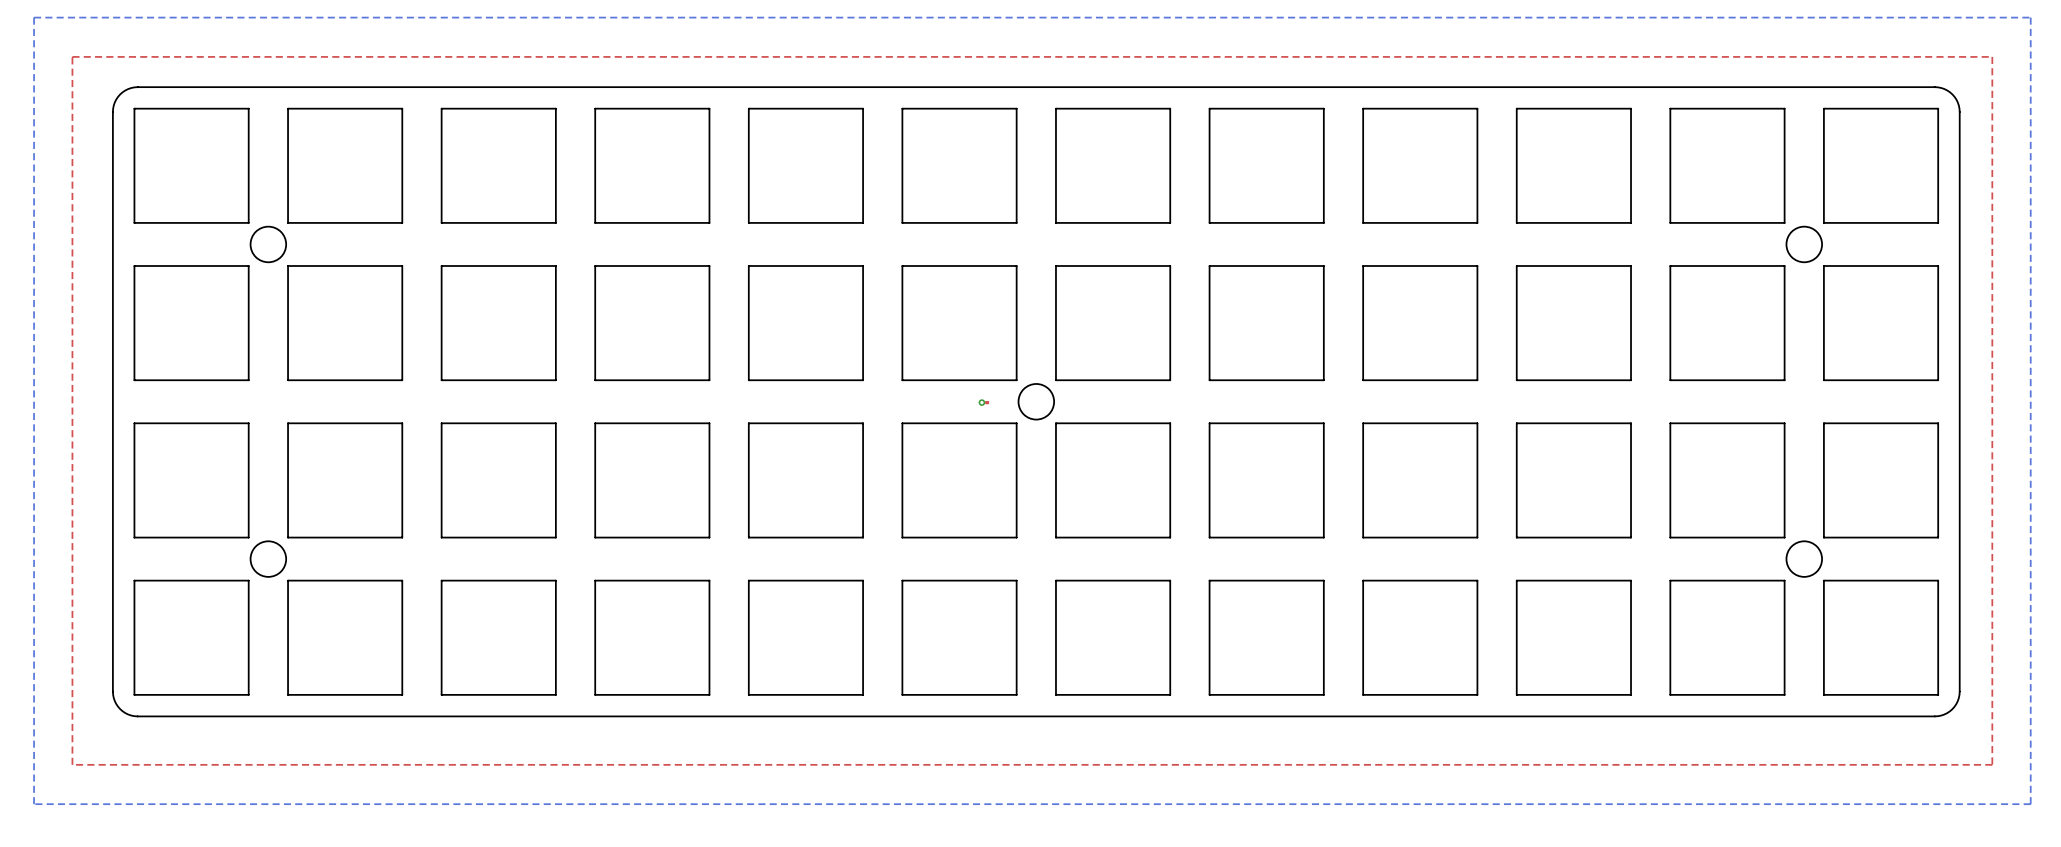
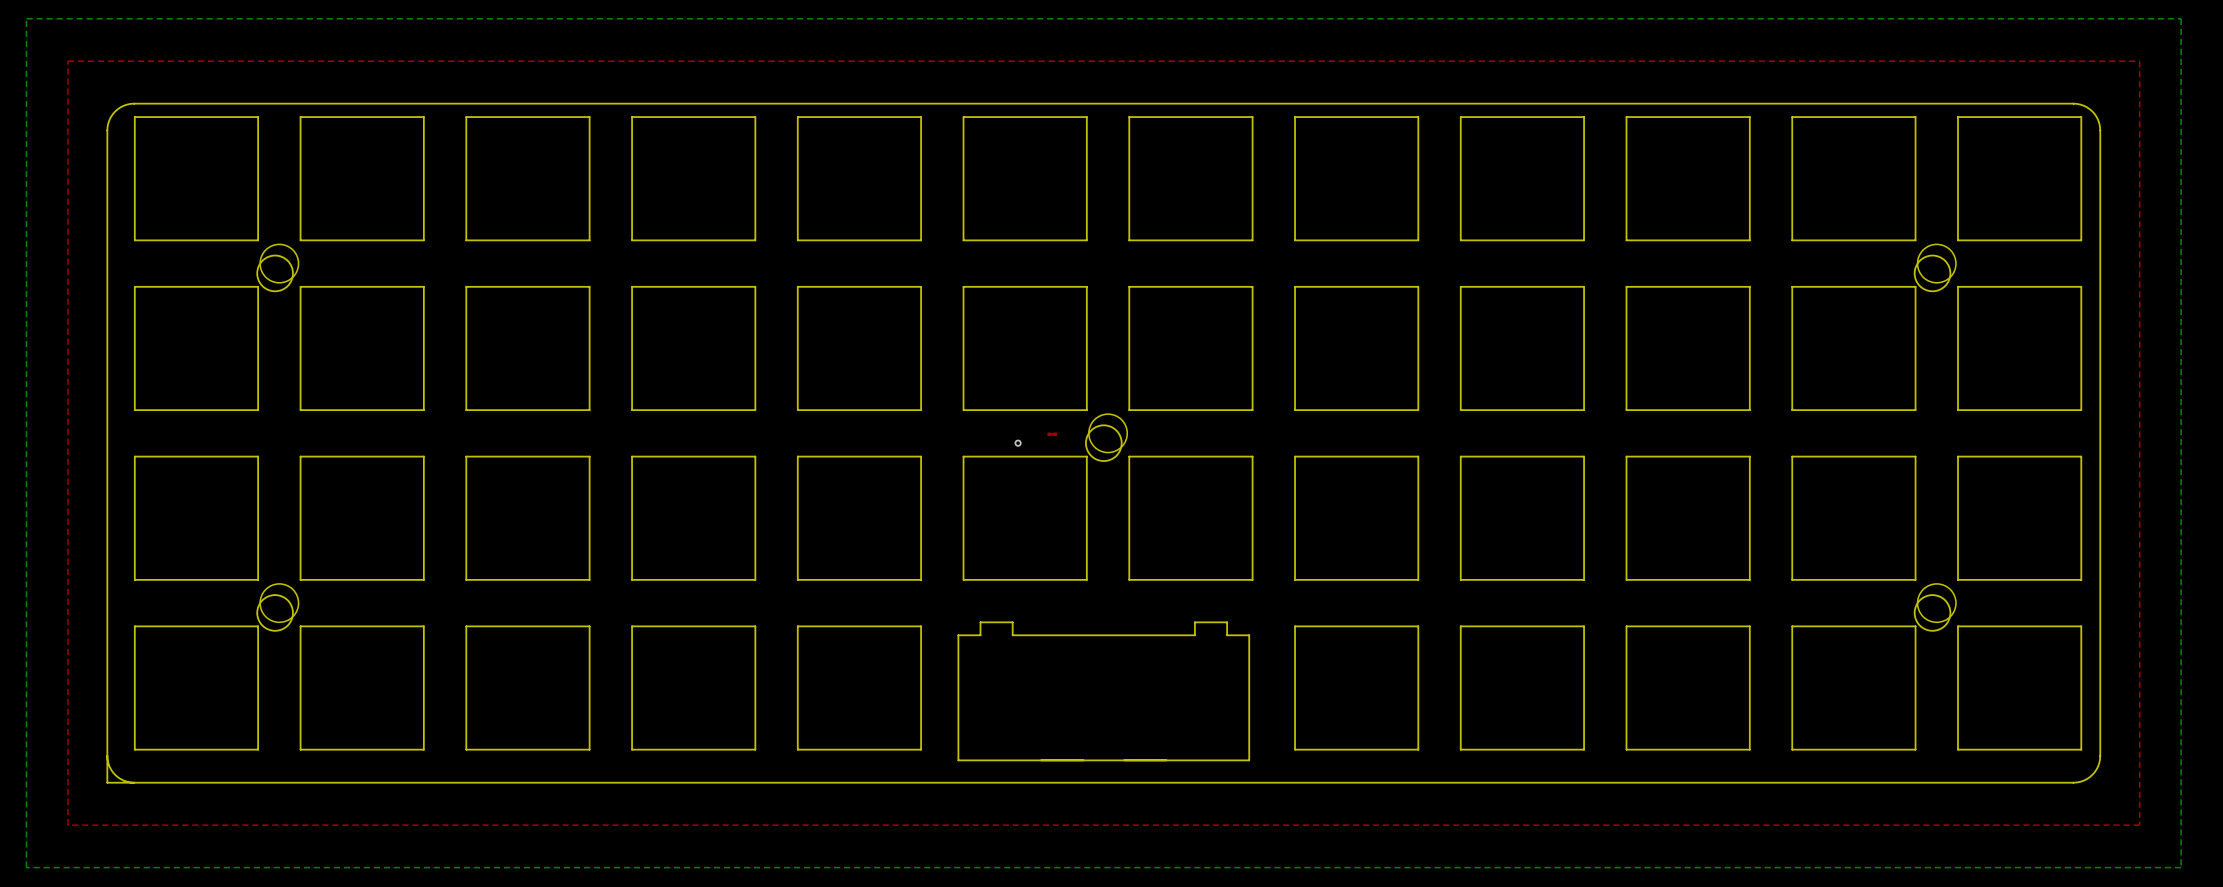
board edge: (137, 87) (1941, 87) (1954, 96) (1959, 111) (1958, 698) (1950, 711) (1934, 716) (131, 715) (118, 706) (112, 691) (112, 111) (114, 102) (120, 94) (128, 89) (137, 87) -> (107, 130) (109, 120) (115, 111) (123, 105) (134, 103) (2080, 104) (2094, 114) (2100, 130) (2099, 762) (2089, 777) (2073, 782) (107, 782) (107, 130)
round board edge: none -> [256, 254, 294, 293]
round board edge: none -> [1913, 254, 1952, 293]
round board edge: none -> [1085, 424, 1123, 462]
via position: (981, 402) -> (1018, 443)
round board edge: none -> [256, 594, 294, 632]
round board edge: none -> [1913, 594, 1952, 632]
board edge: none -> (980, 622) (980, 635) (958, 635) (958, 760) (1249, 760) (1249, 635) (1227, 635) (1227, 622) (1194, 622) (1194, 635) (1012, 635) (1012, 622) (980, 622)
board edge: (902, 580) (1016, 580) (1016, 694) (902, 694) (902, 580) -> none
board edge: (1055, 580) (1170, 580) (1170, 694) (1055, 694) (1055, 580) -> none
board edge: none -> (107, 755) (109, 766) (115, 774) (123, 780) (134, 782)

